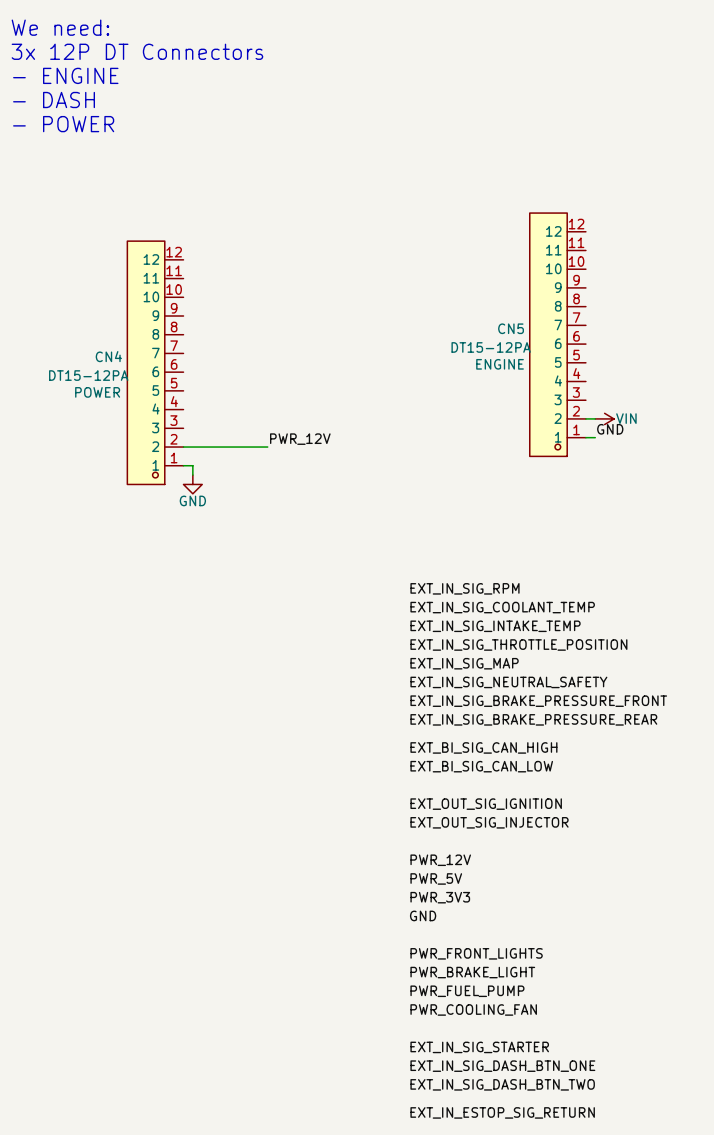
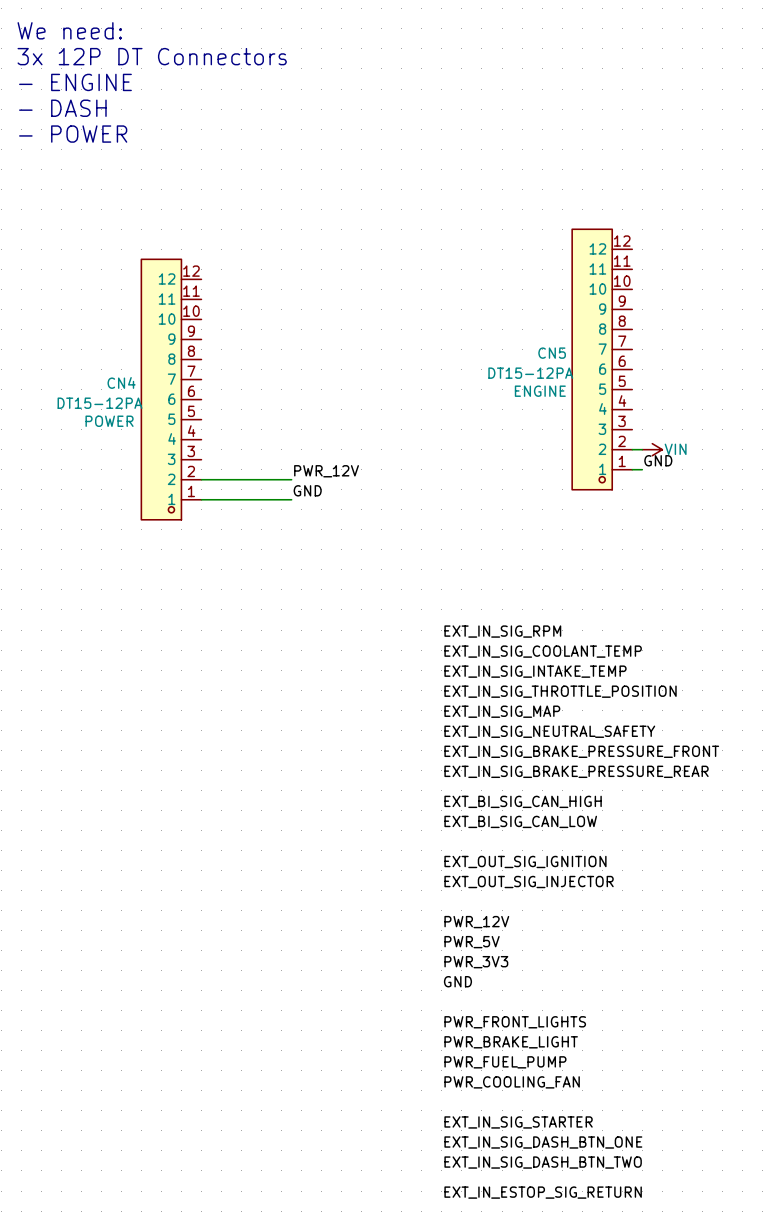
label: none -> GND (307, 490)
wire: (192, 465) (192, 475) -> (211, 499) (291, 499)
power symbol: GND (192, 484) -> none

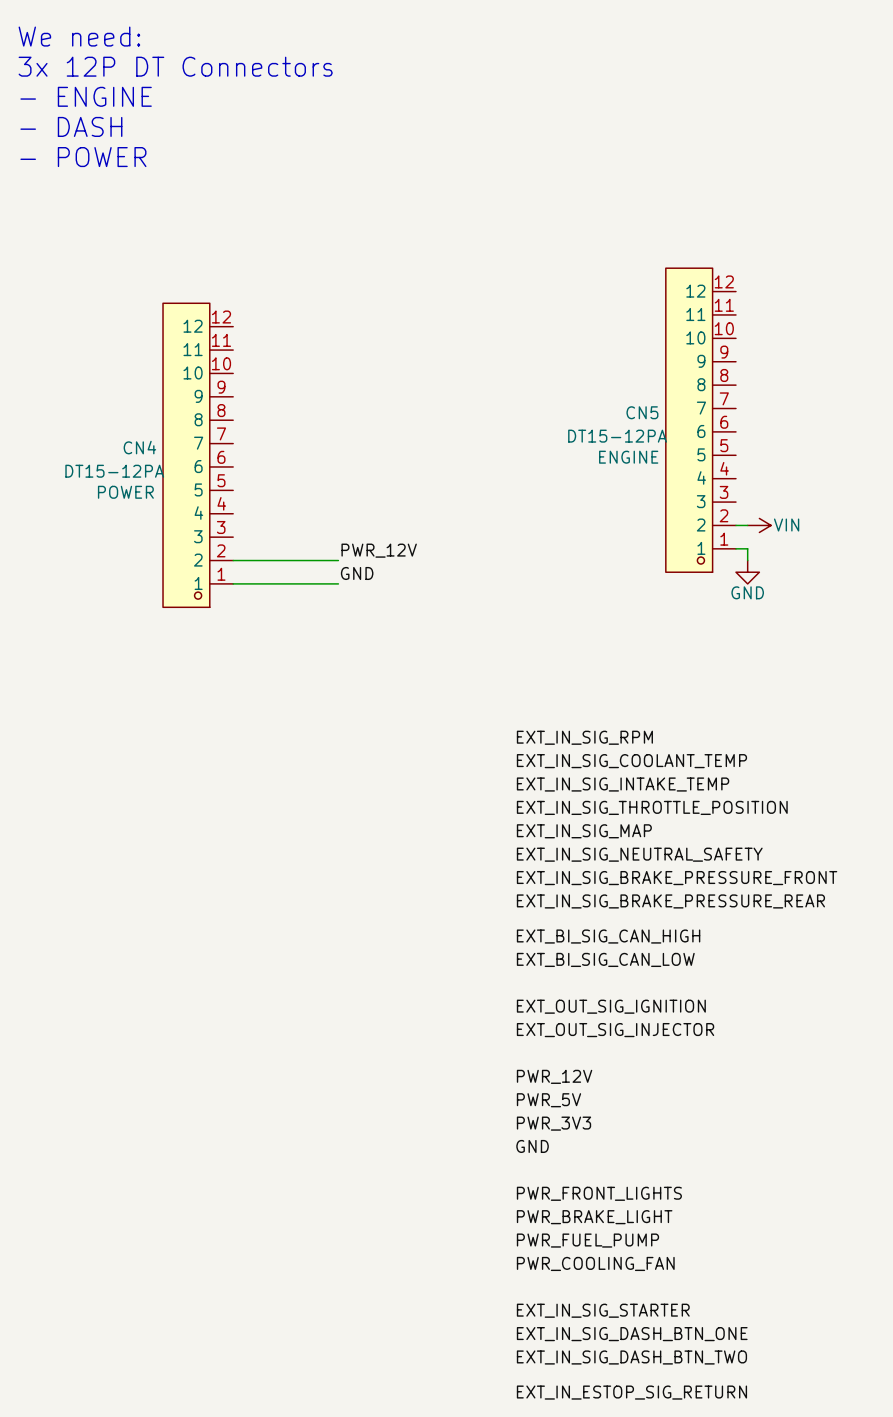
label: GND (658, 460) -> none
wire: none -> (747, 548) (747, 560)
power symbol: none -> GND (747, 572)

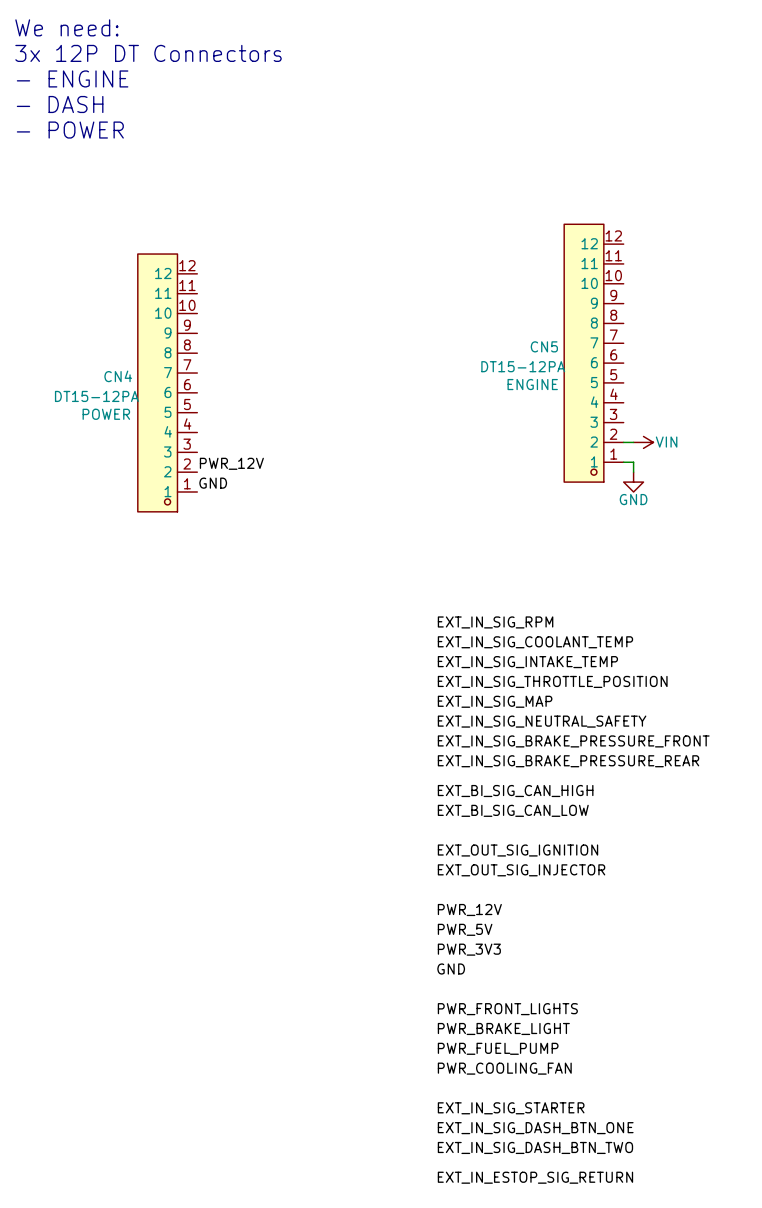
label position: PWR_12V (379, 550) -> PWR_12V (231, 463)
wire: (233, 560) (338, 560) -> none
label position: GND (357, 573) -> GND (213, 483)
wire: (233, 583) (338, 583) -> none

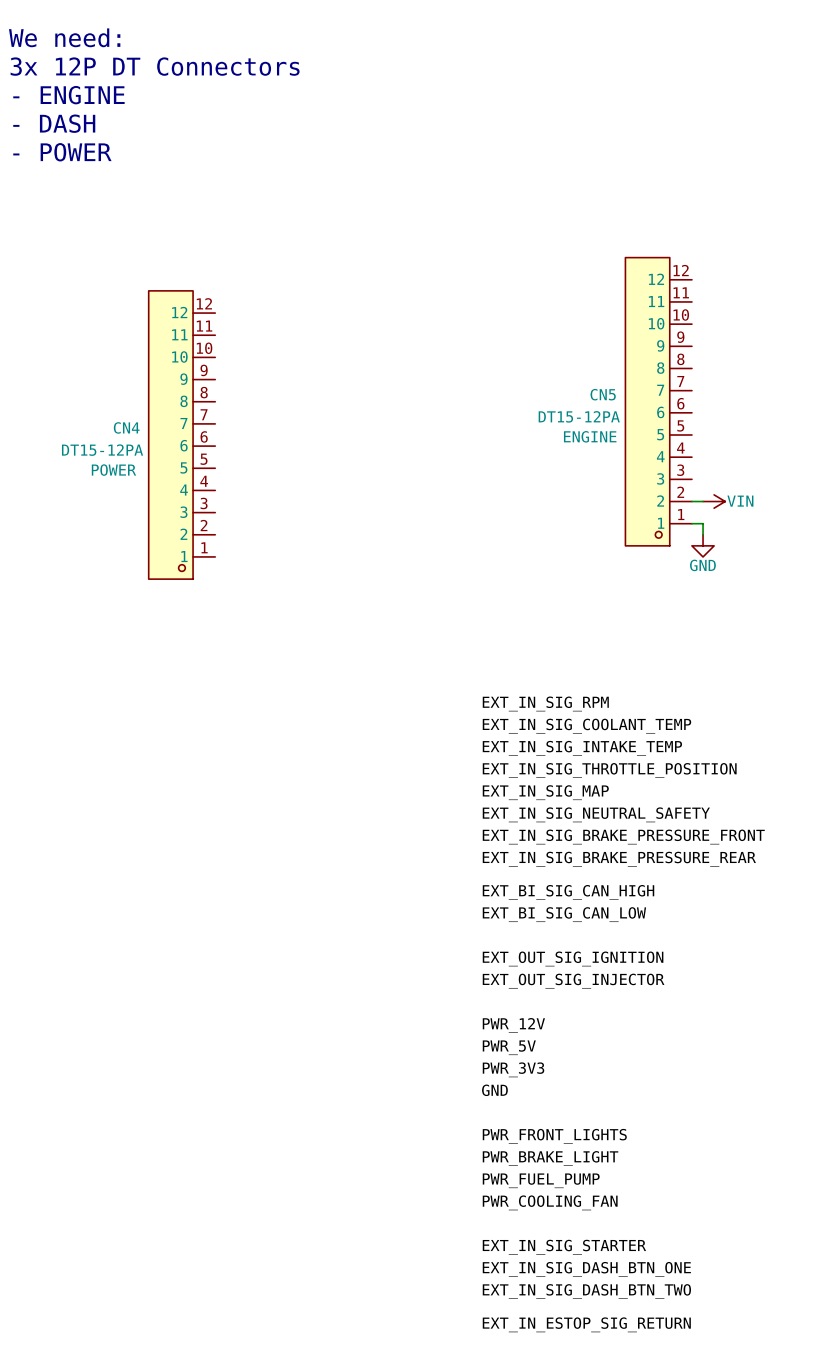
label: PWR_12V (231, 463) -> none
label: GND (213, 483) -> none

